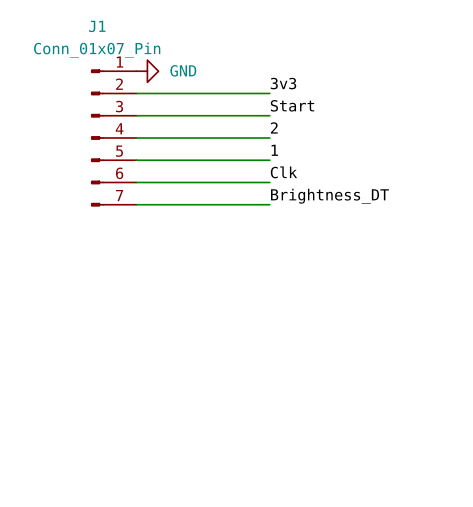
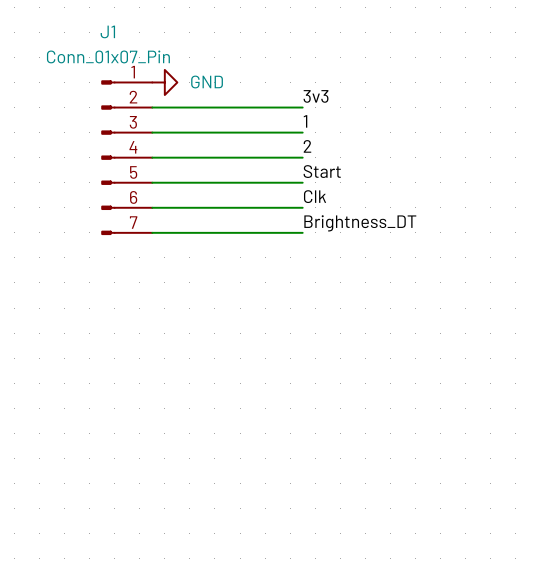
label: Start (292, 105) -> 1 (305, 121)
label: 1 (274, 150) -> Start (322, 171)

